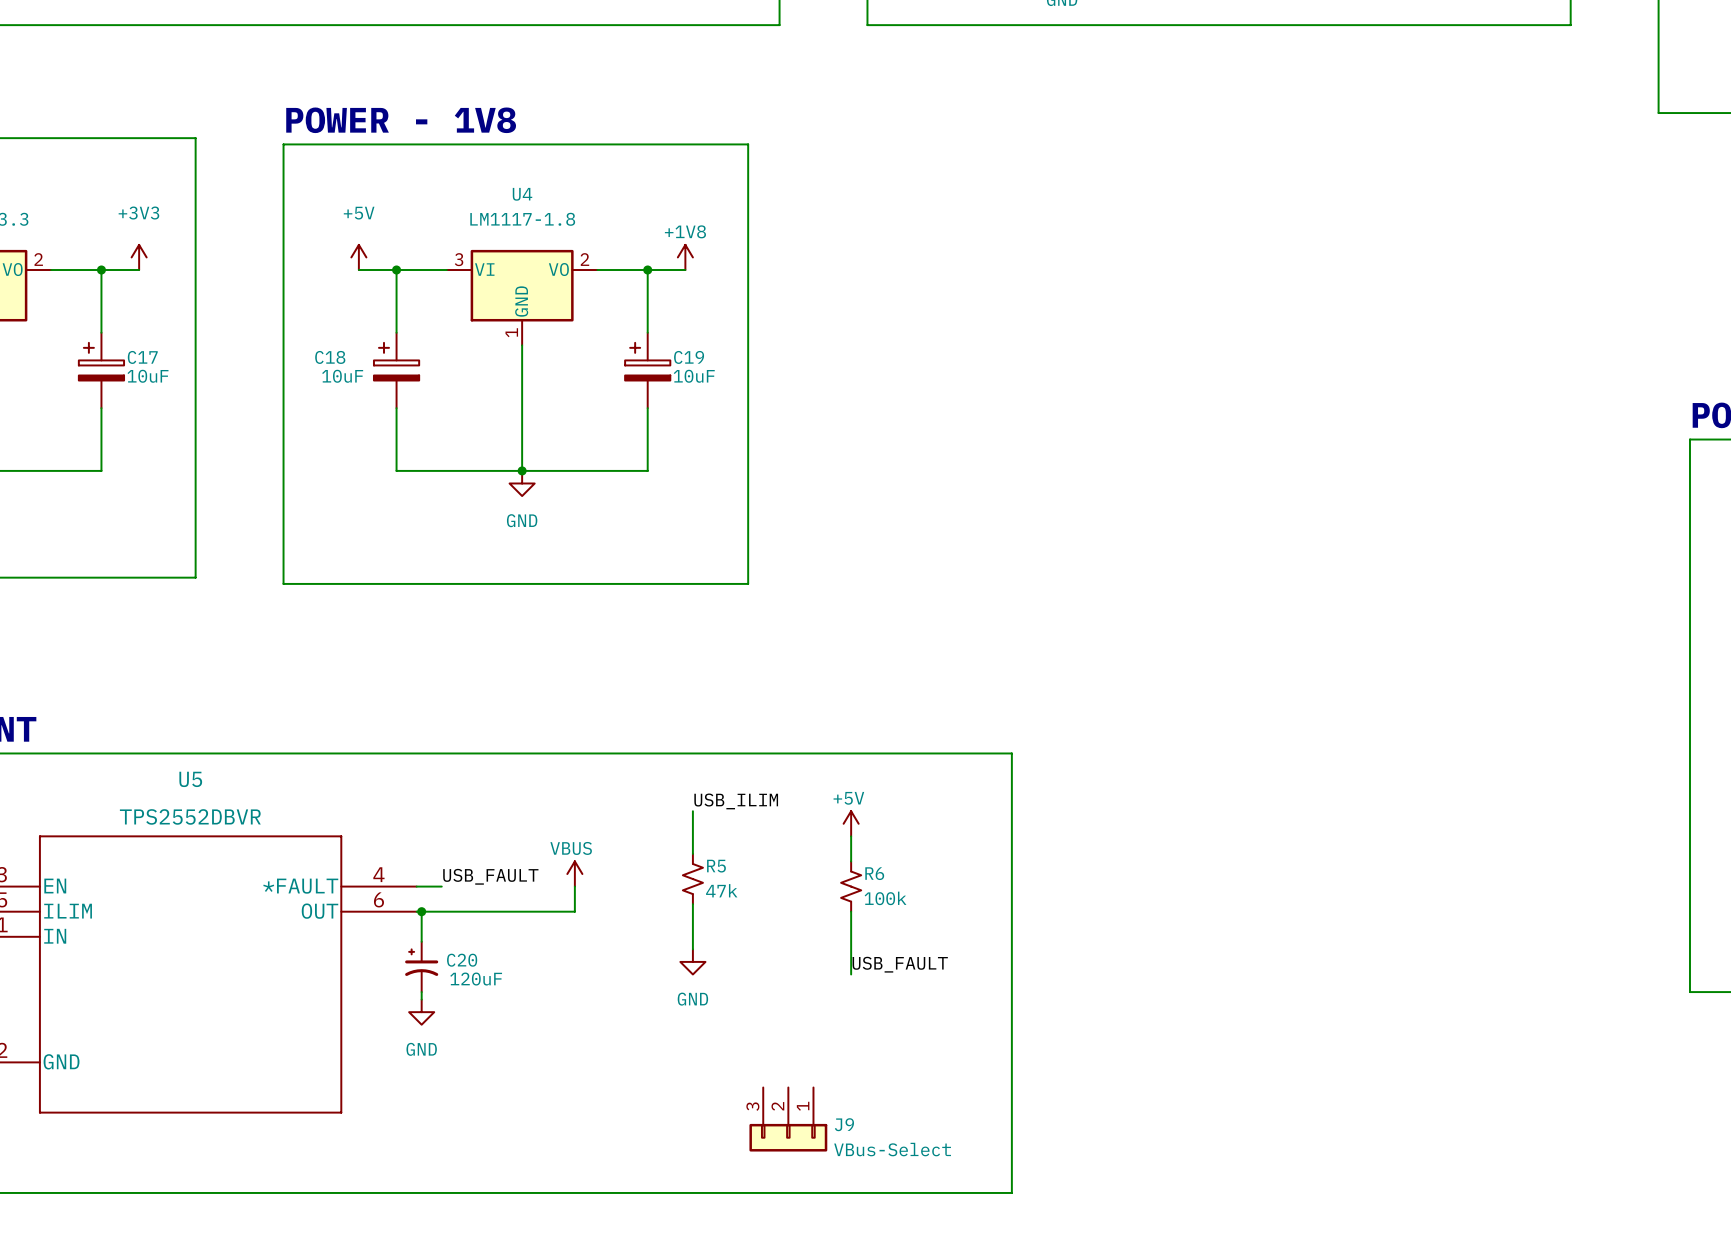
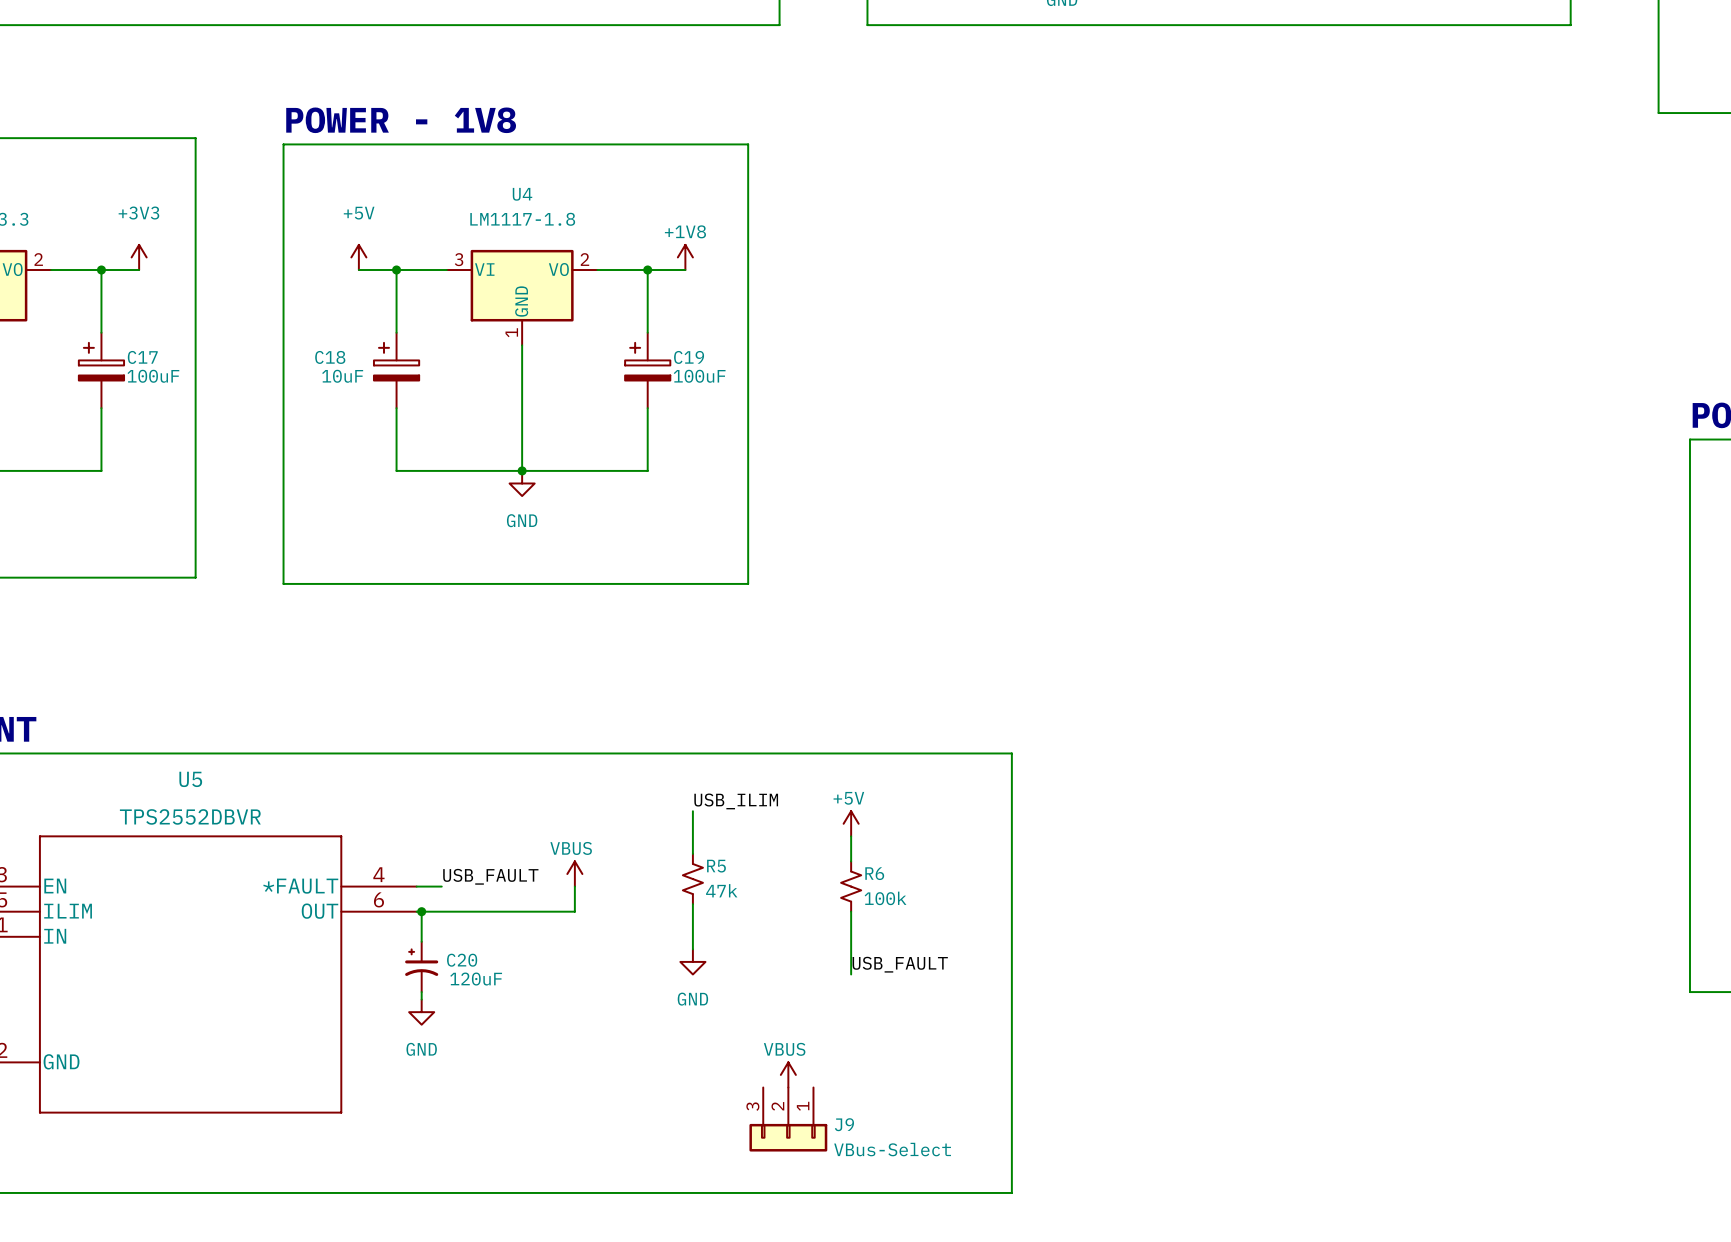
C17 value: 10uF (148, 376) -> 100uF (153, 376)
C19 value: 10uF (694, 376) -> 100uF (699, 376)
power symbol: none -> VBUS (788, 1074)

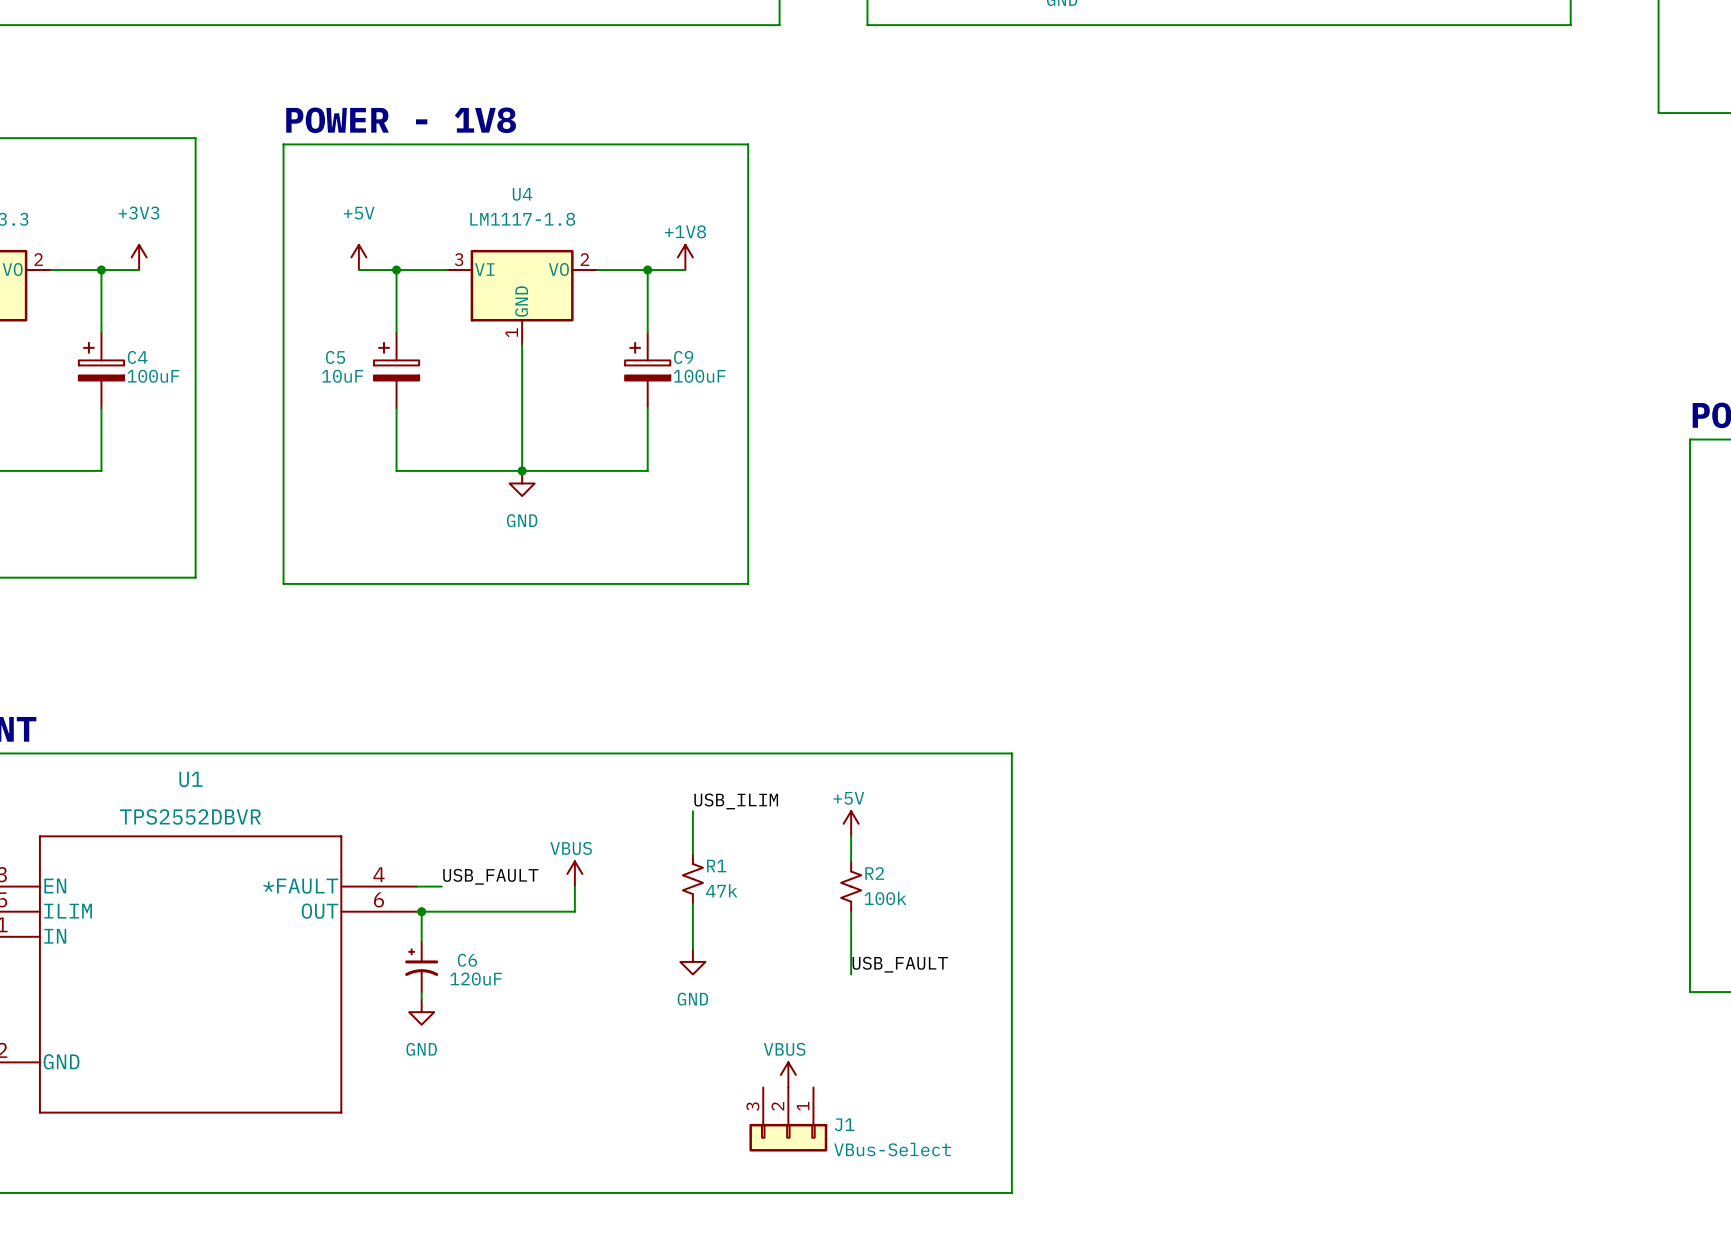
C17 name: C17 (142, 357) -> C4 (137, 357)
C18 name: C18 (330, 357) -> C5 (335, 357)
C19 name: C19 (689, 357) -> C9 (683, 357)
U5 name: U5 (190, 779) -> U1 (190, 779)
R5 name: R5 (716, 866) -> R1 (716, 866)
R6 name: R6 (874, 873) -> R2 (874, 873)
C20 name: C20 (462, 960) -> C6 (467, 960)
J9 name: J9 (844, 1124) -> J1 (844, 1124)

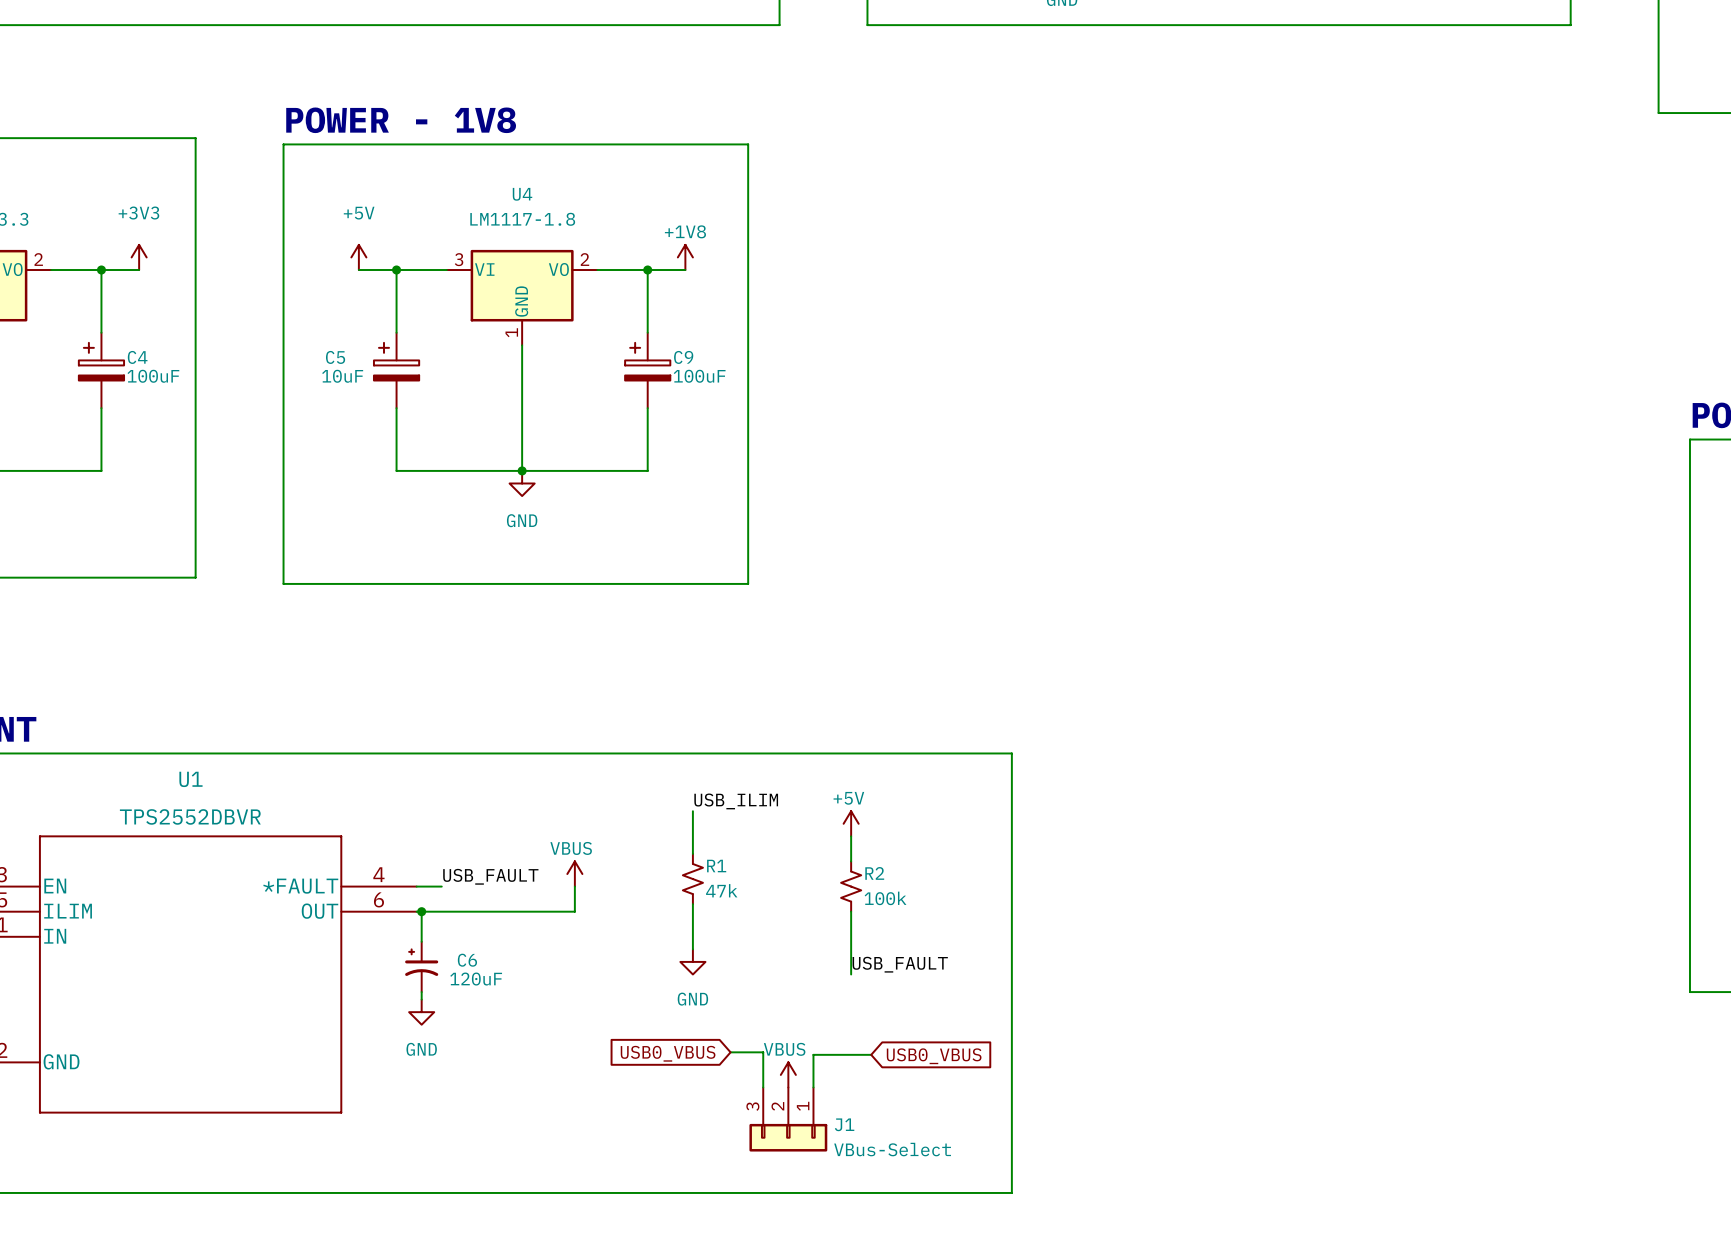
wire: none -> (730, 1052) (763, 1052) (763, 1087)
global label: none -> USB0_VBUS (668, 1053)
wire: none -> (871, 1054) (813, 1054) (813, 1087)
global label: none -> USB0_VBUS (934, 1056)

